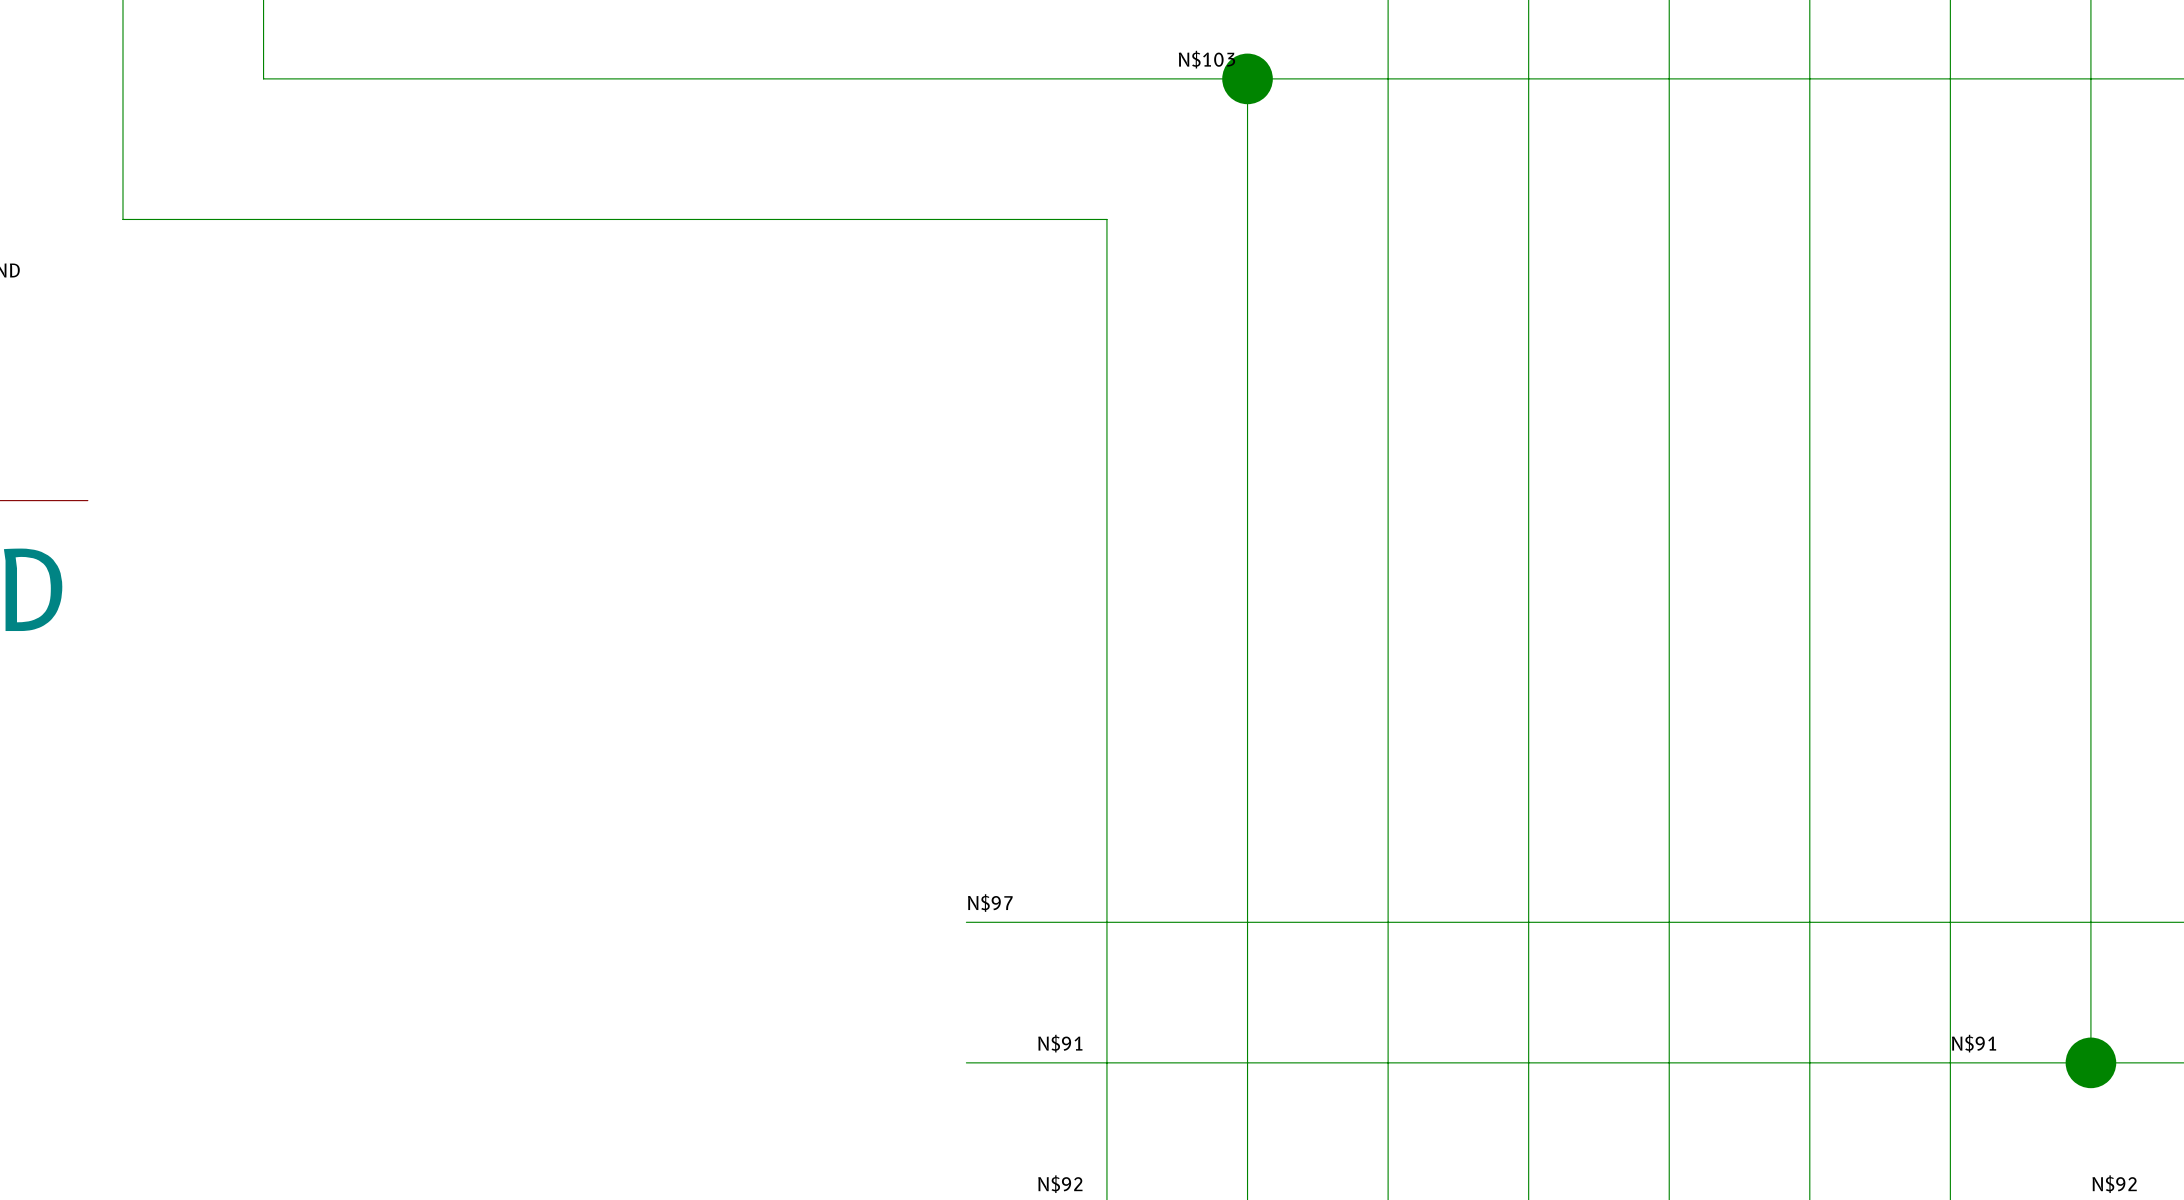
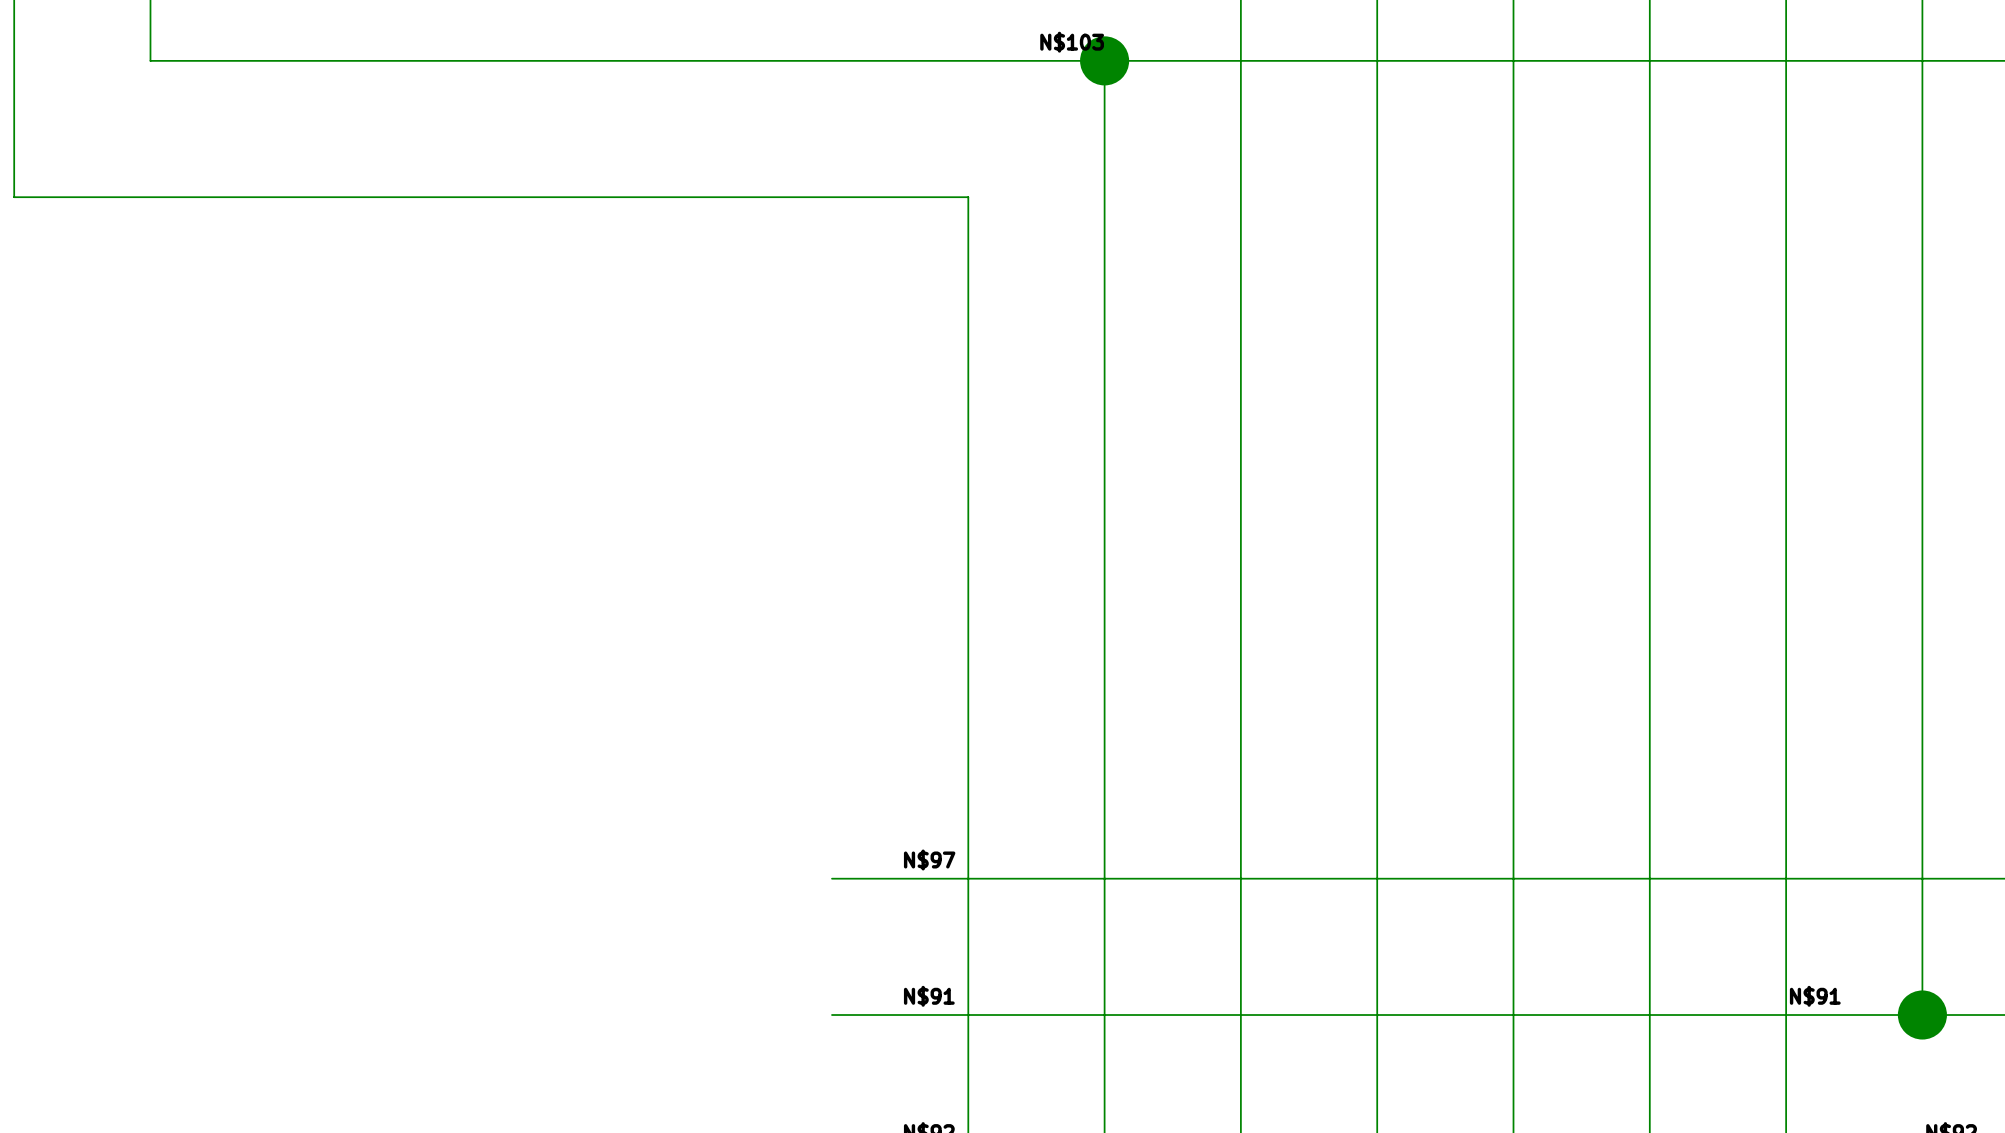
label position: N$97 (990, 903) -> N$97 (929, 859)

